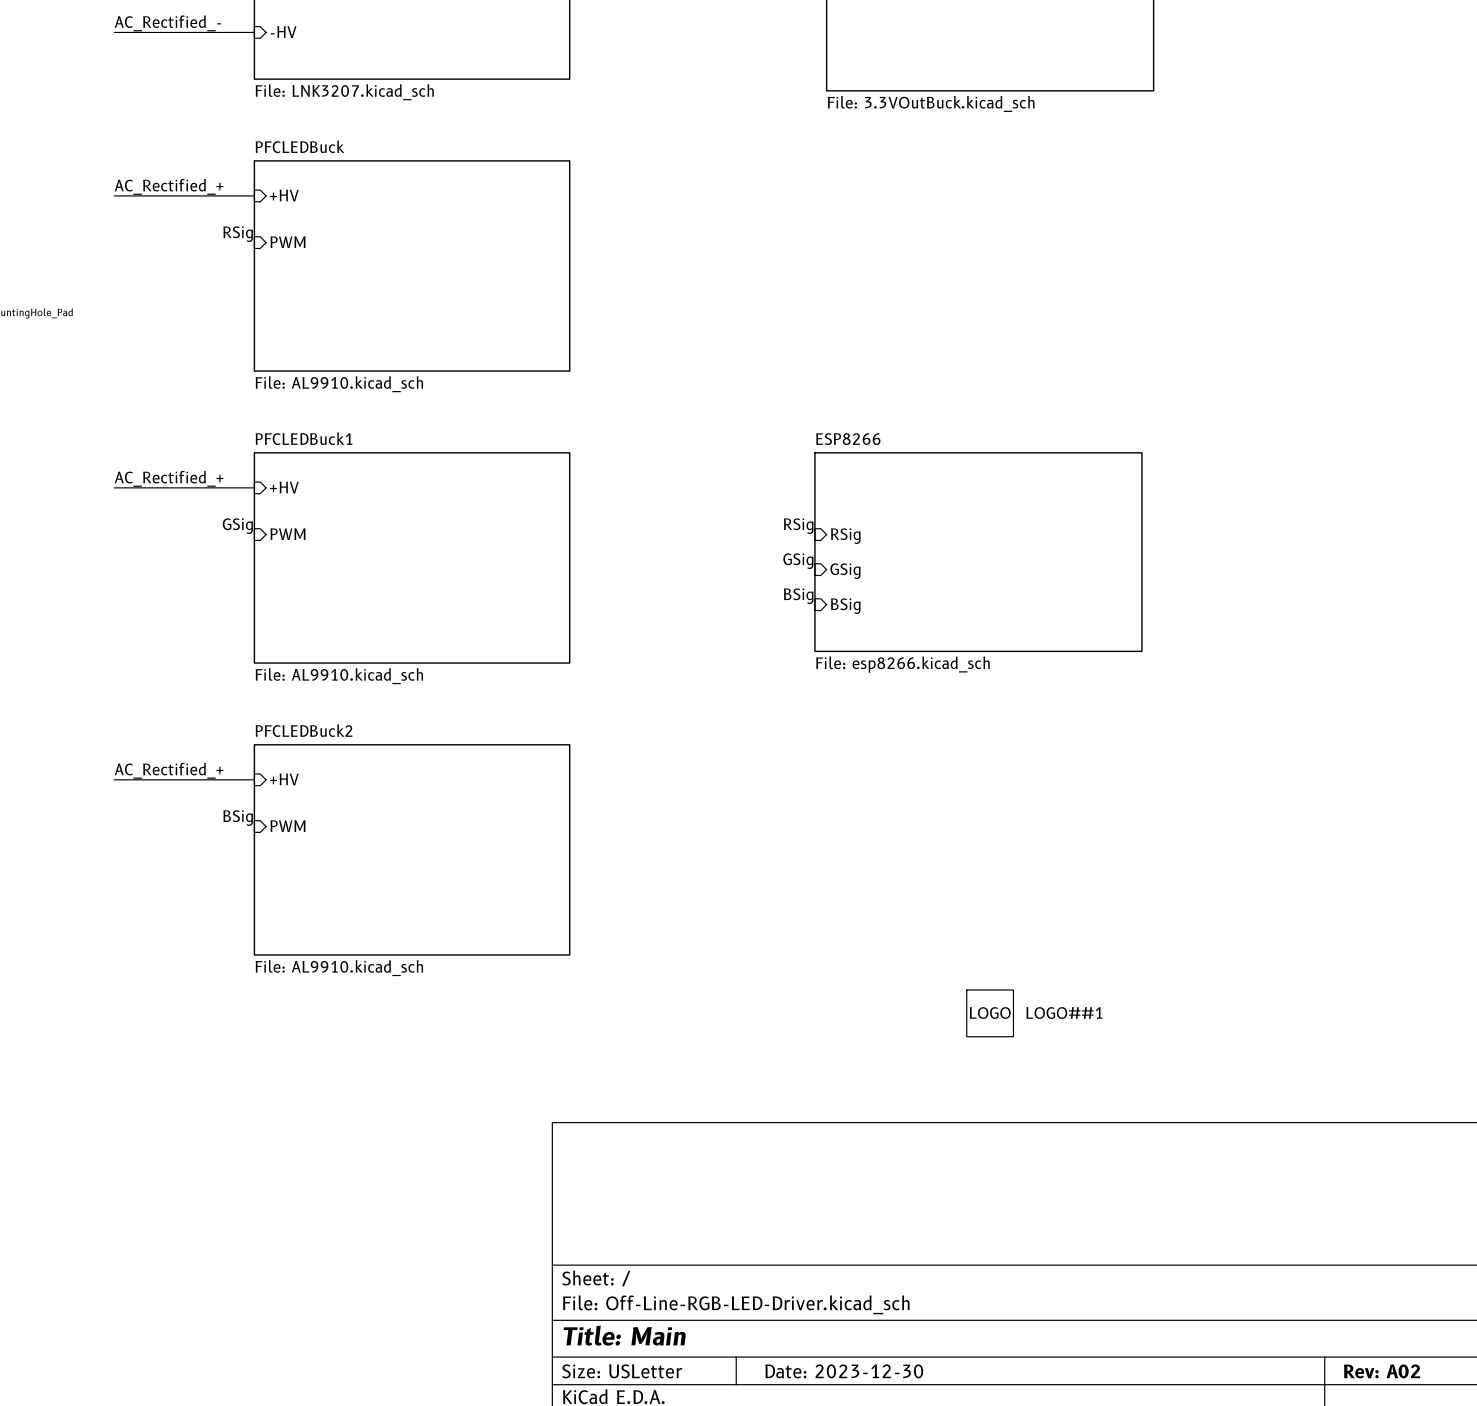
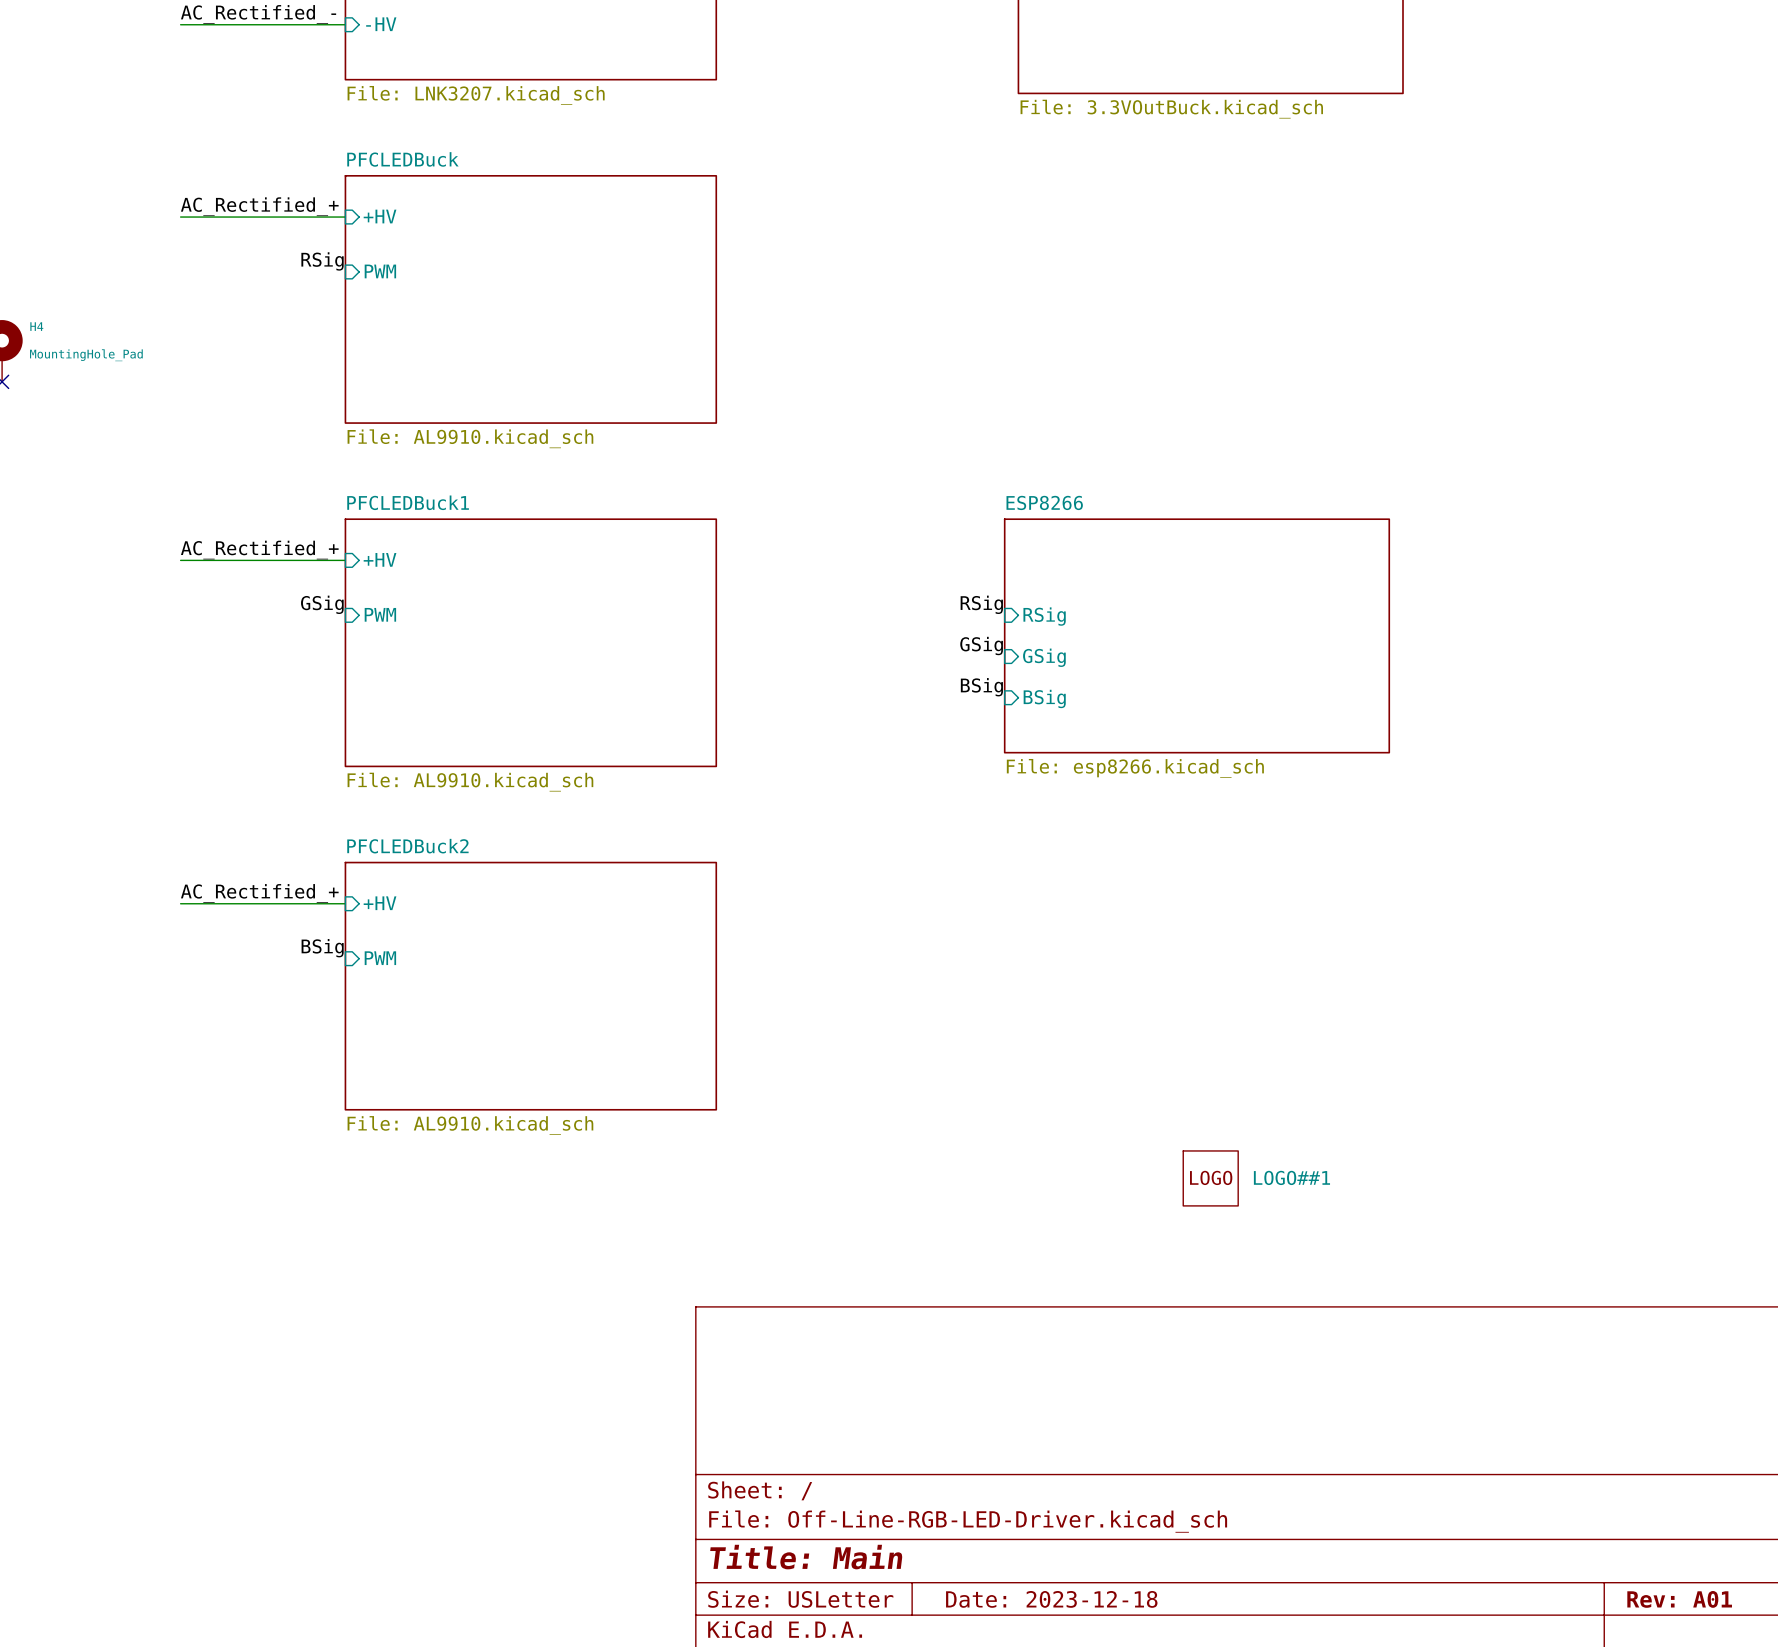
title block: Date: 2023-12-30 (844, 1371) -> Date: 2023-12-18 (1051, 1599)
title block: Rev: A02 (1381, 1371) -> Rev: A01 (1679, 1599)

